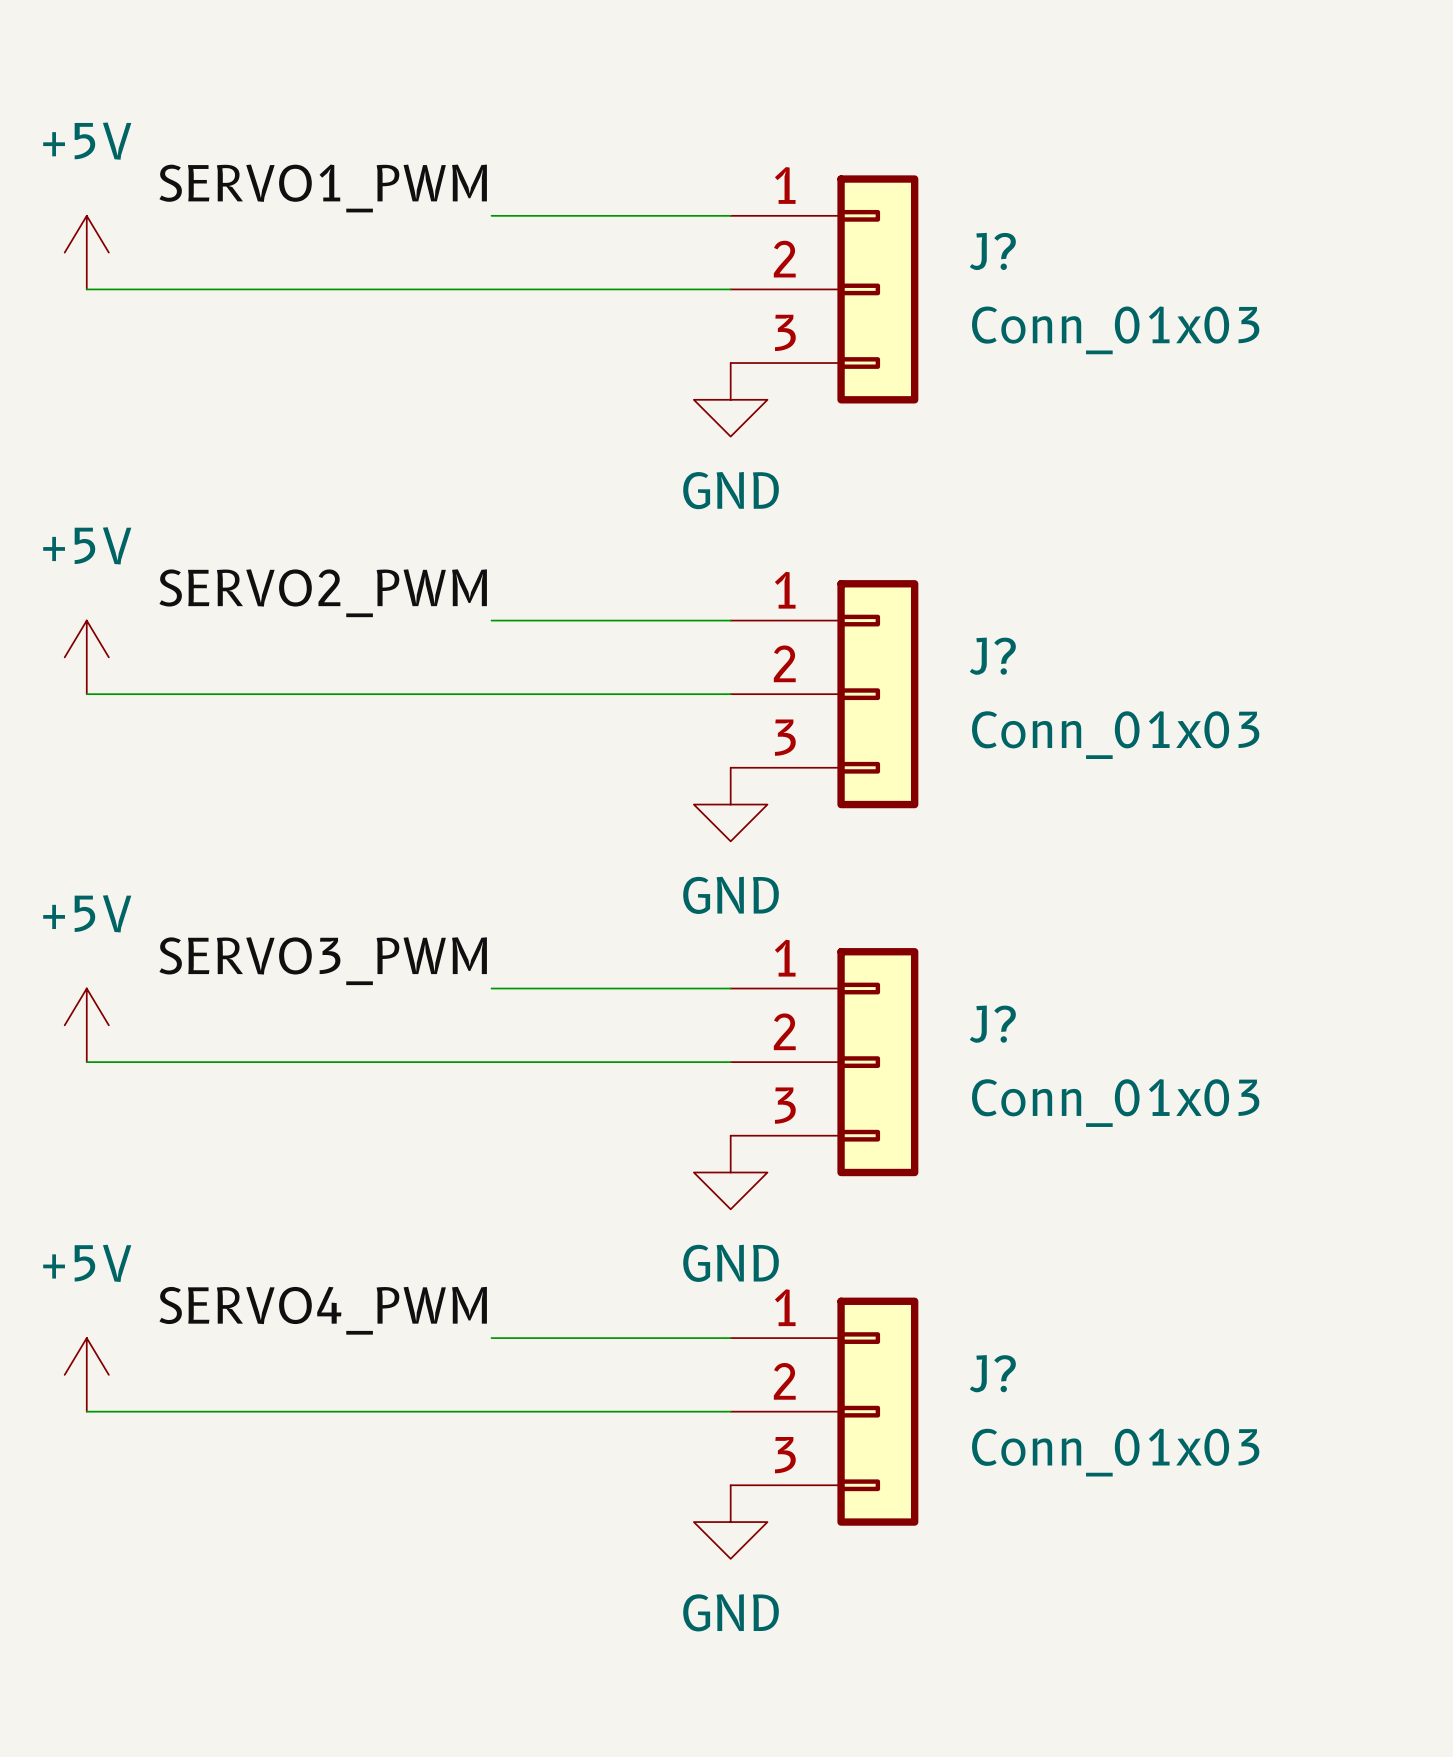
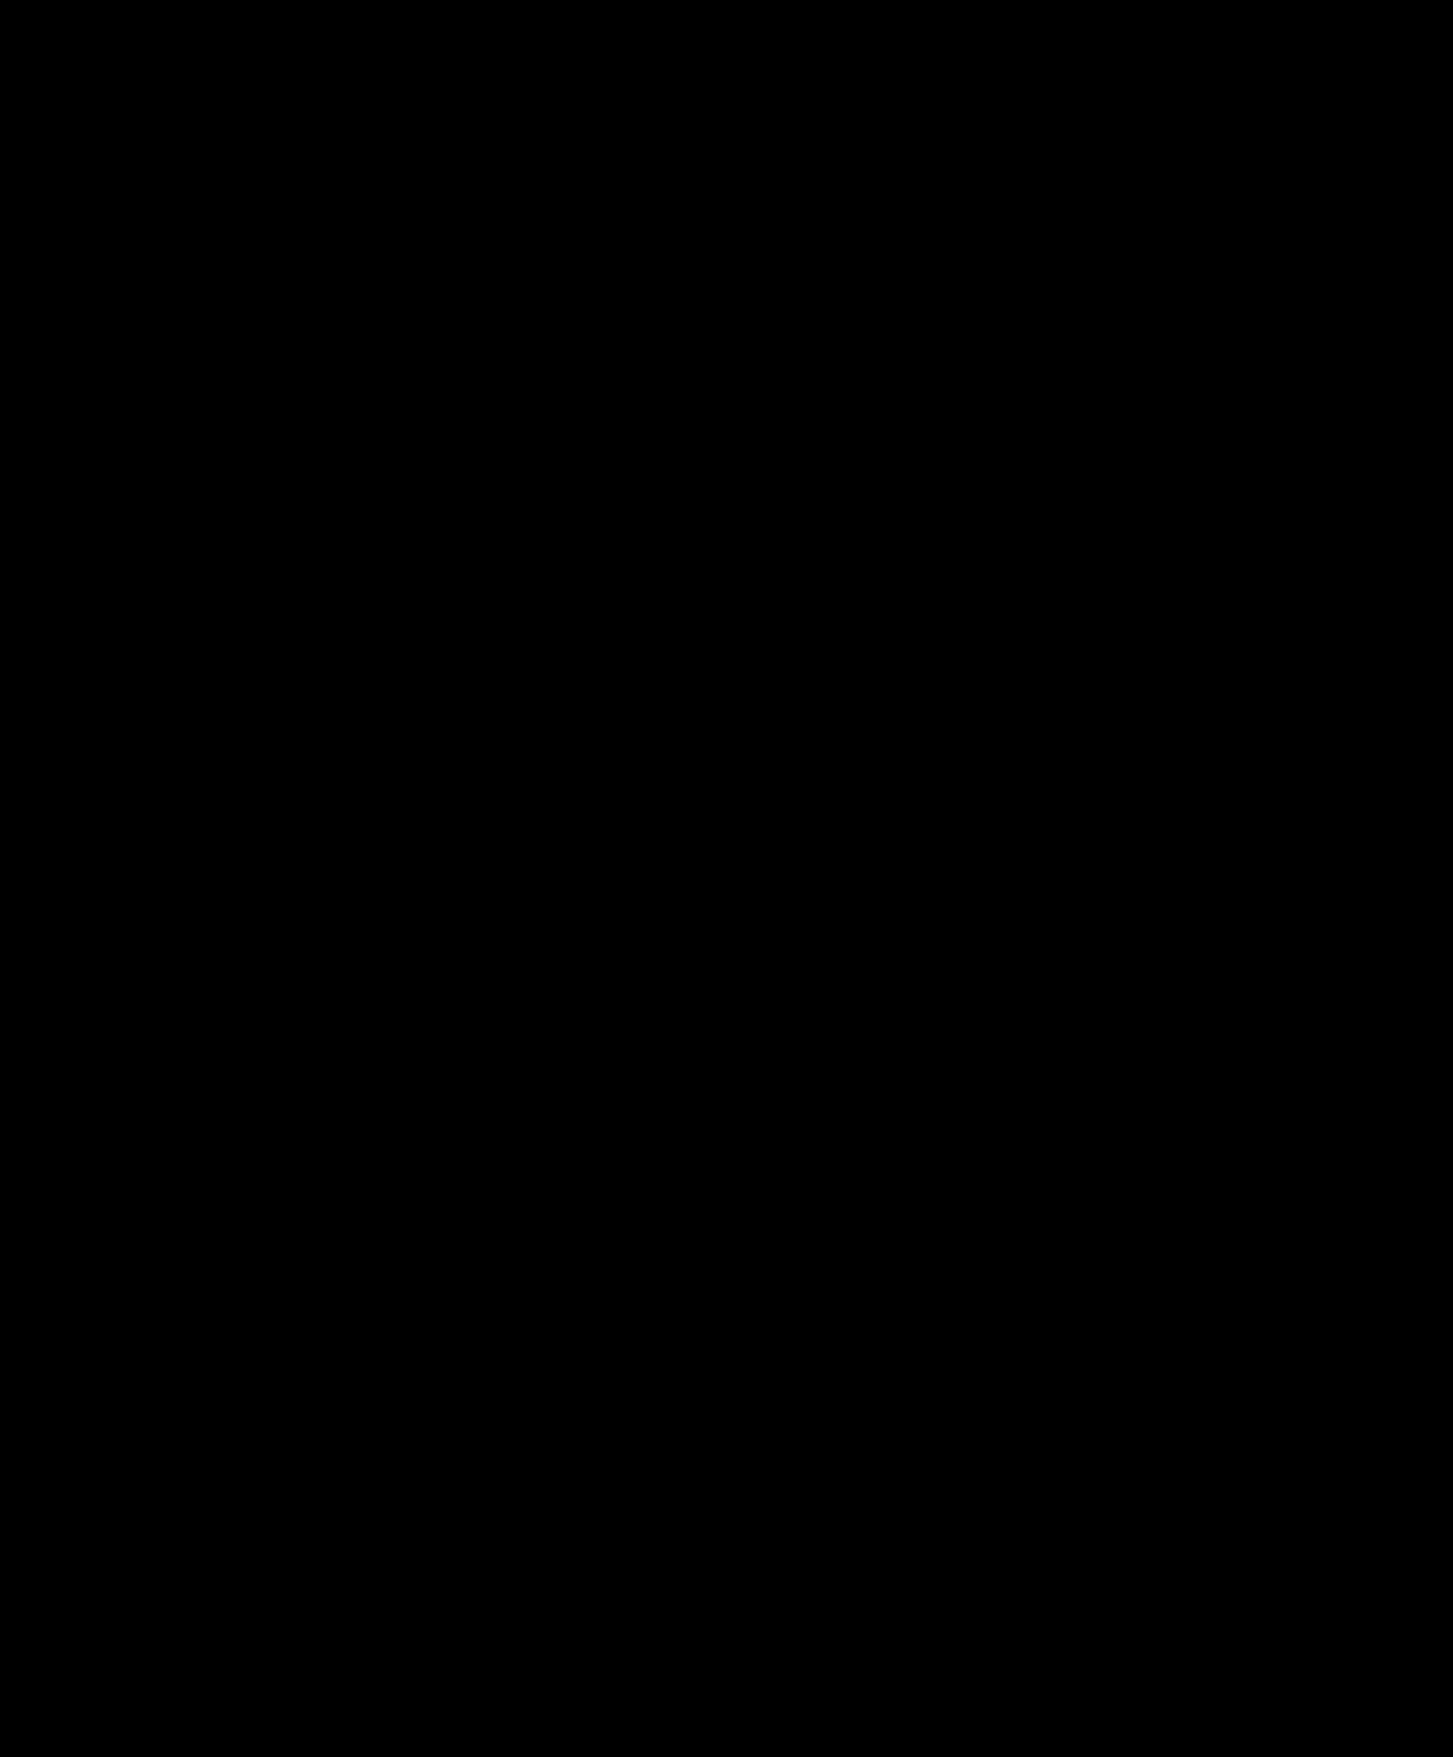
label: SERVO1_PWM (323, 188) -> none
wire: (491, 215) (730, 215) -> none
power symbol: +5V (86, 252) -> none
wire: (86, 289) (730, 289) -> none
J?: Conn_01x03 (824, 289) -> none
power symbol: GND (730, 399) -> none
label: SERVO2_PWM (323, 593) -> none
wire: (491, 620) (730, 620) -> none
power symbol: +5V (86, 657) -> none
wire: (86, 694) (730, 694) -> none
J?: Conn_01x03 (824, 694) -> none
power symbol: GND (730, 804) -> none
label: SERVO3_PWM (323, 961) -> none
wire: (491, 988) (730, 988) -> none
power symbol: +5V (86, 1025) -> none
wire: (86, 1062) (730, 1062) -> none
J?: Conn_01x03 (824, 1062) -> none
power symbol: GND (730, 1172) -> none
label: SERVO4_PWM (323, 1310) -> none
wire: (491, 1338) (730, 1338) -> none
power symbol: +5V (86, 1374) -> none
wire: (86, 1411) (730, 1411) -> none
J?: Conn_01x03 (824, 1411) -> none
power symbol: GND (730, 1522) -> none

